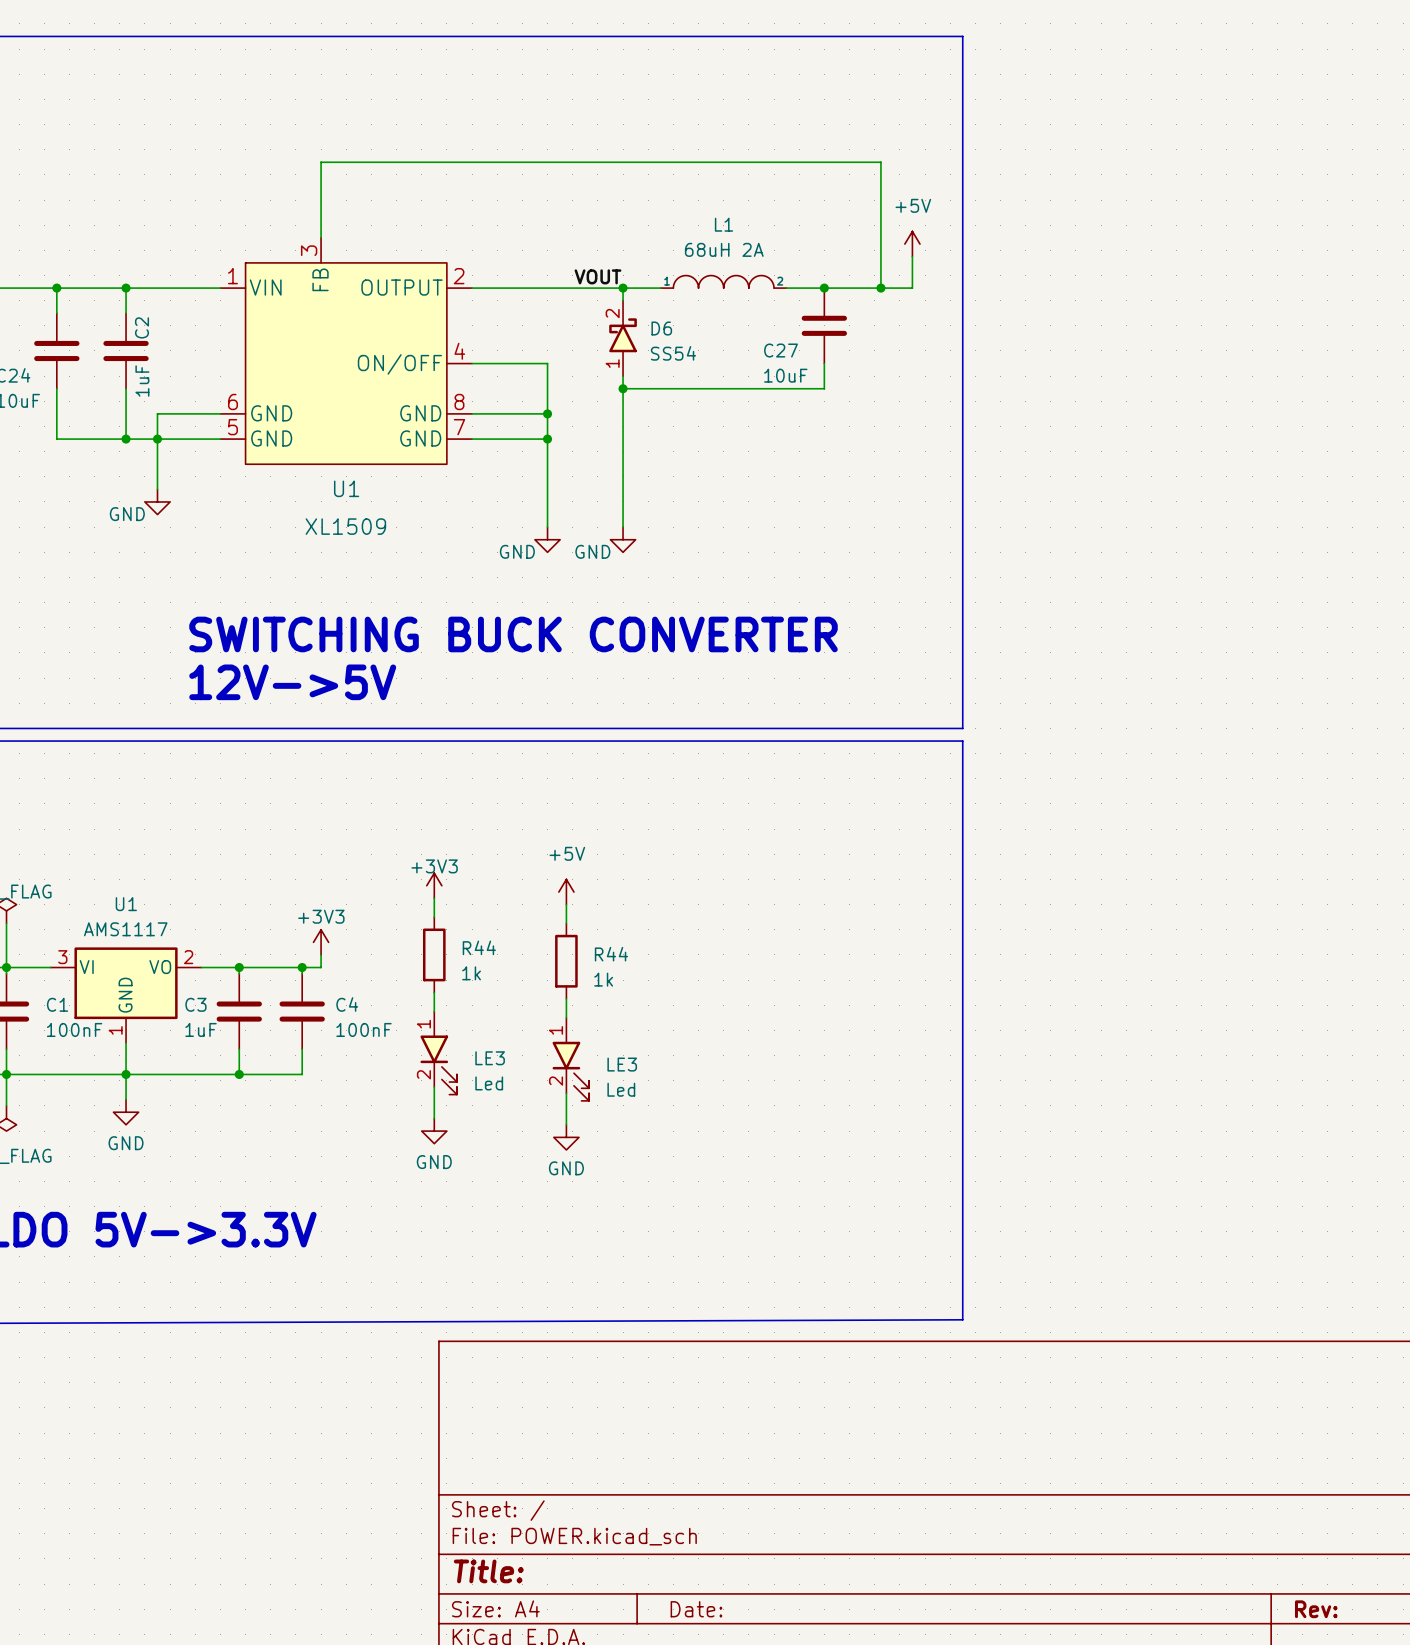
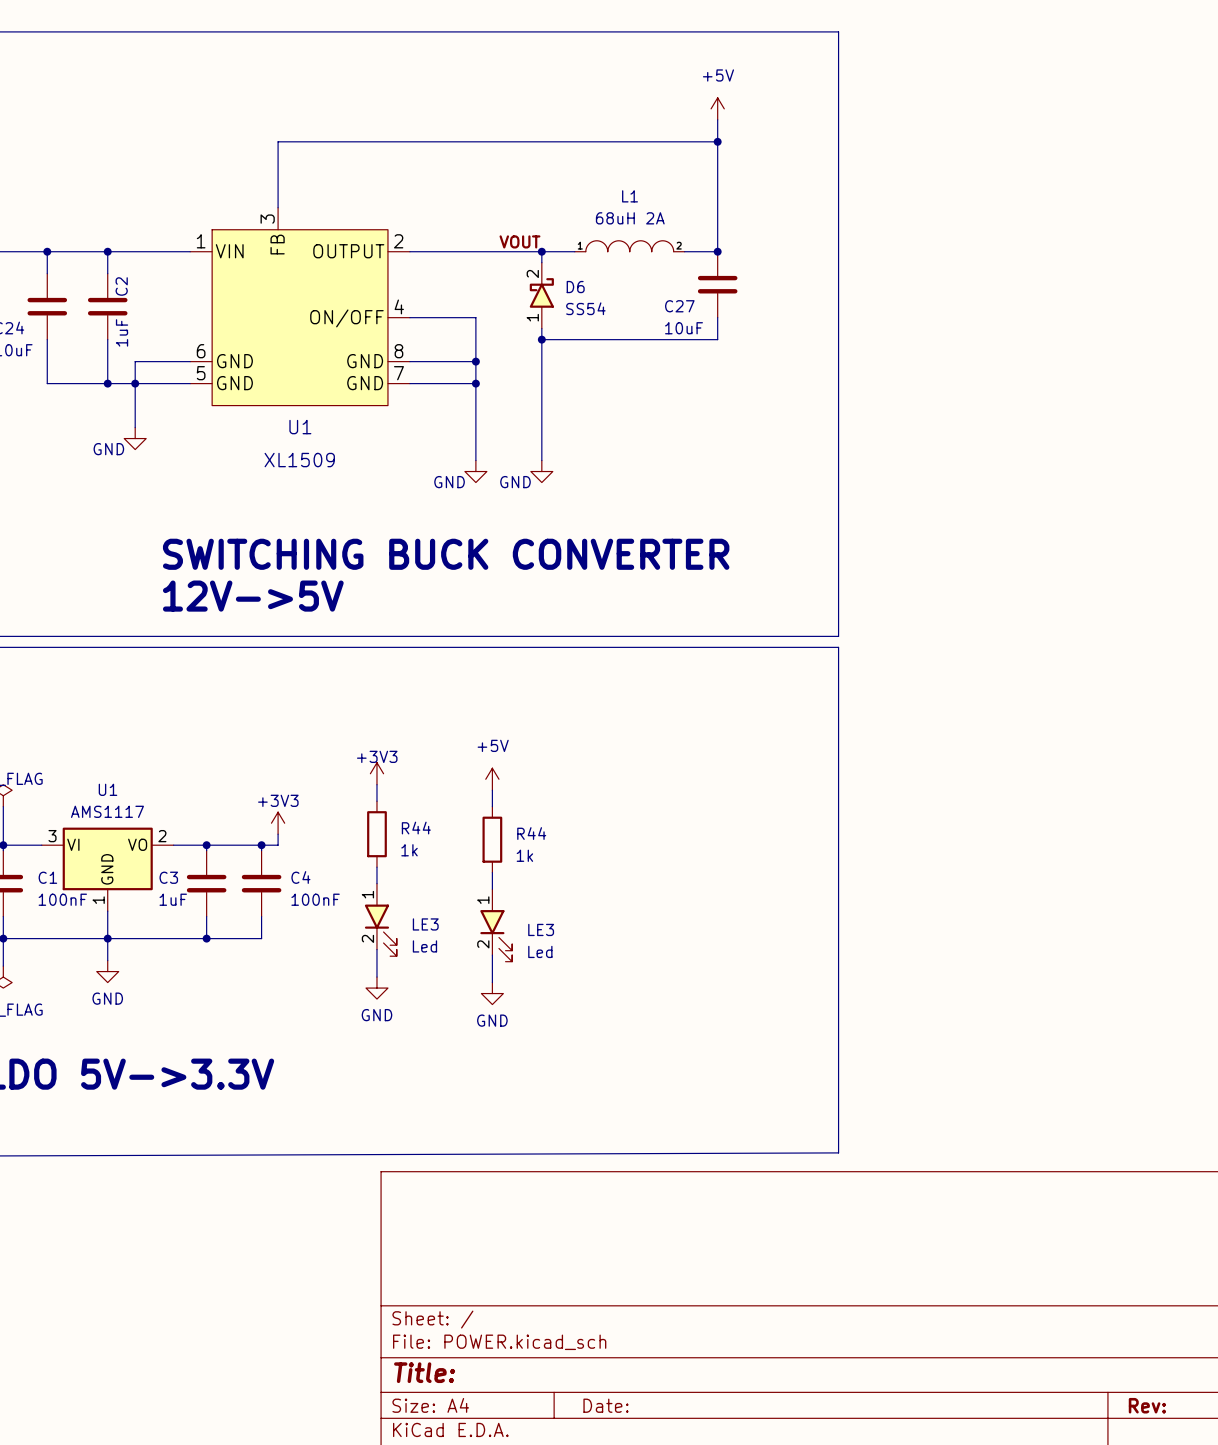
wire: (824, 162) (880, 162) (880, 288) -> none
junction: none -> (717, 141)
power symbol position: +5V (912, 244) -> +5V (717, 108)
wire: (912, 256) (912, 288) (824, 288) -> (717, 119) (717, 251)
junction: (880, 288) -> none

